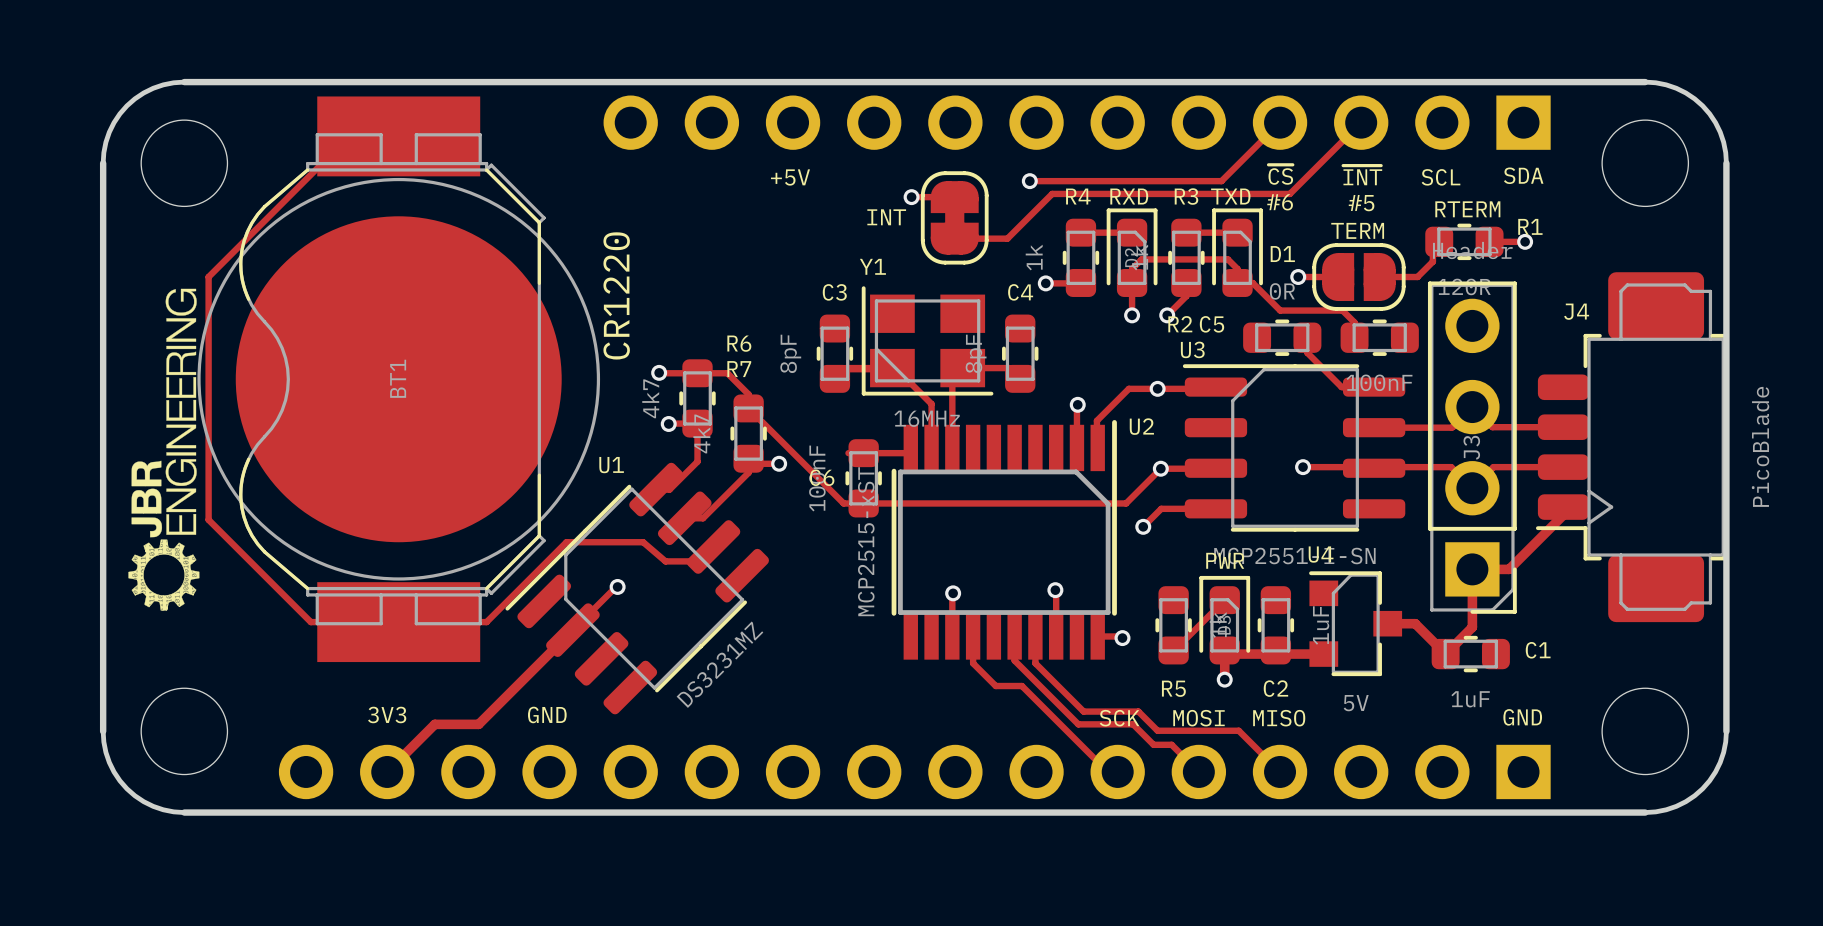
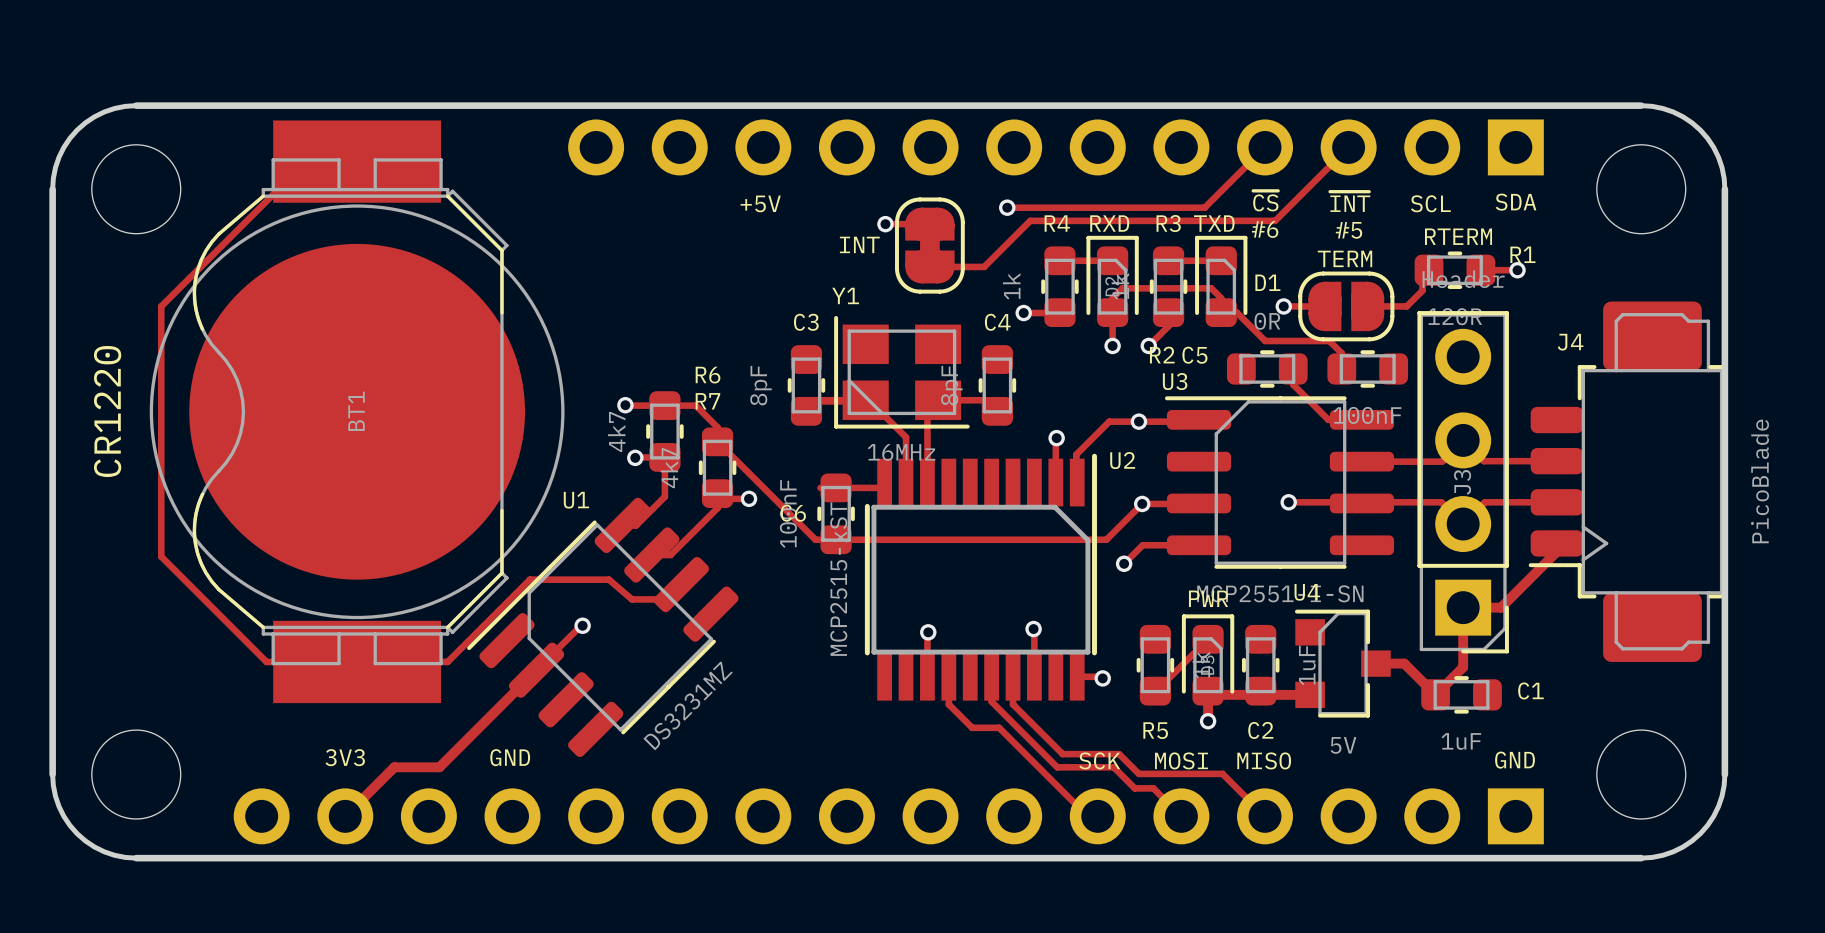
drawing: [128, 288, 200, 611] -> none
BT1 value position: CR1220 (616, 295) -> CR1220 (107, 411)

